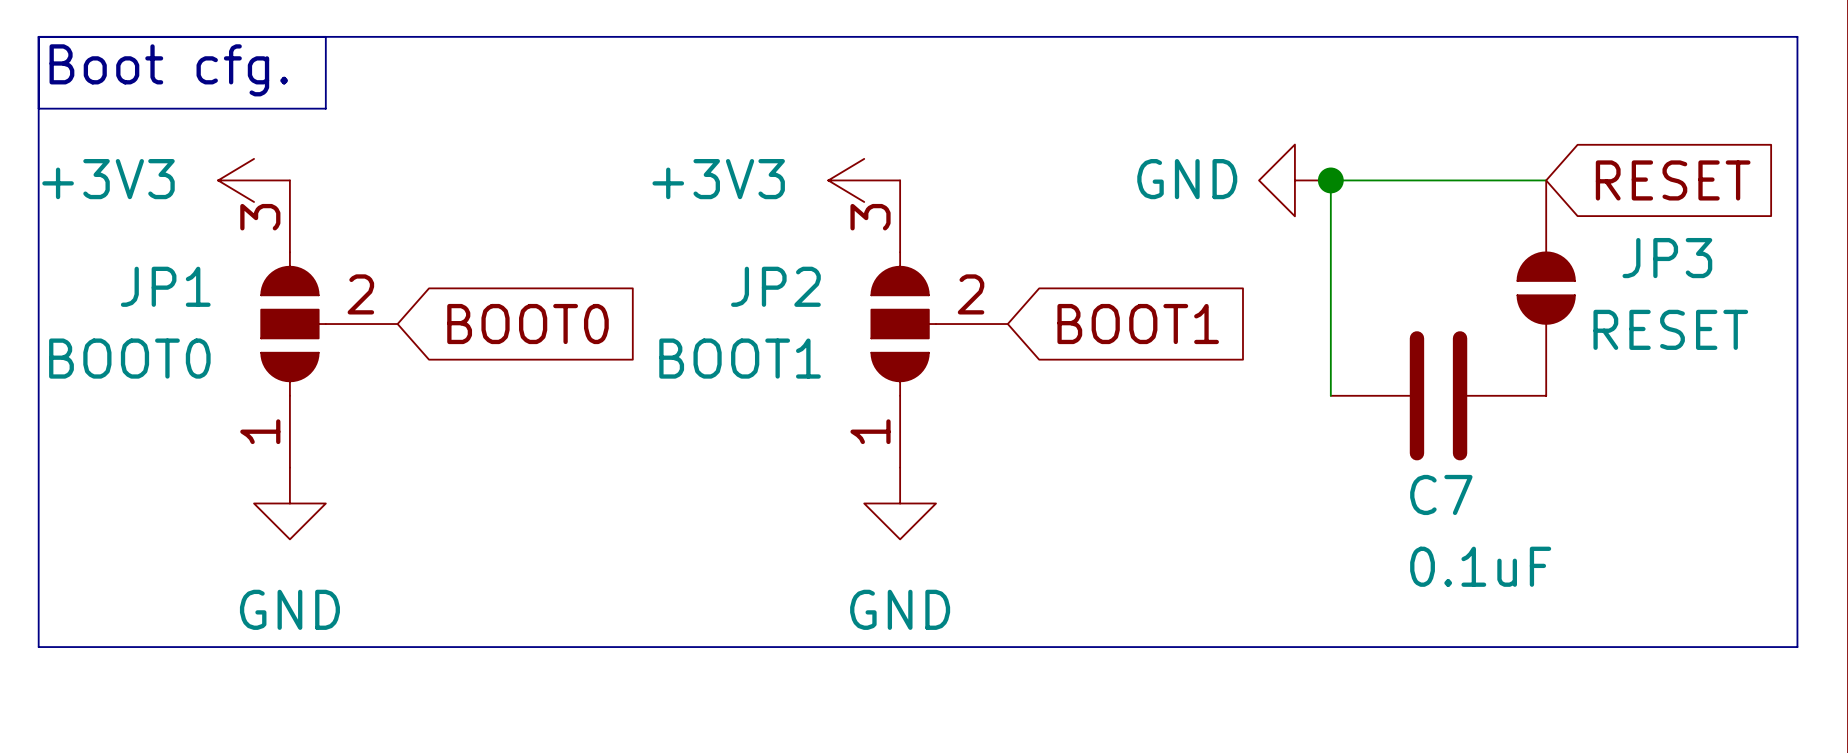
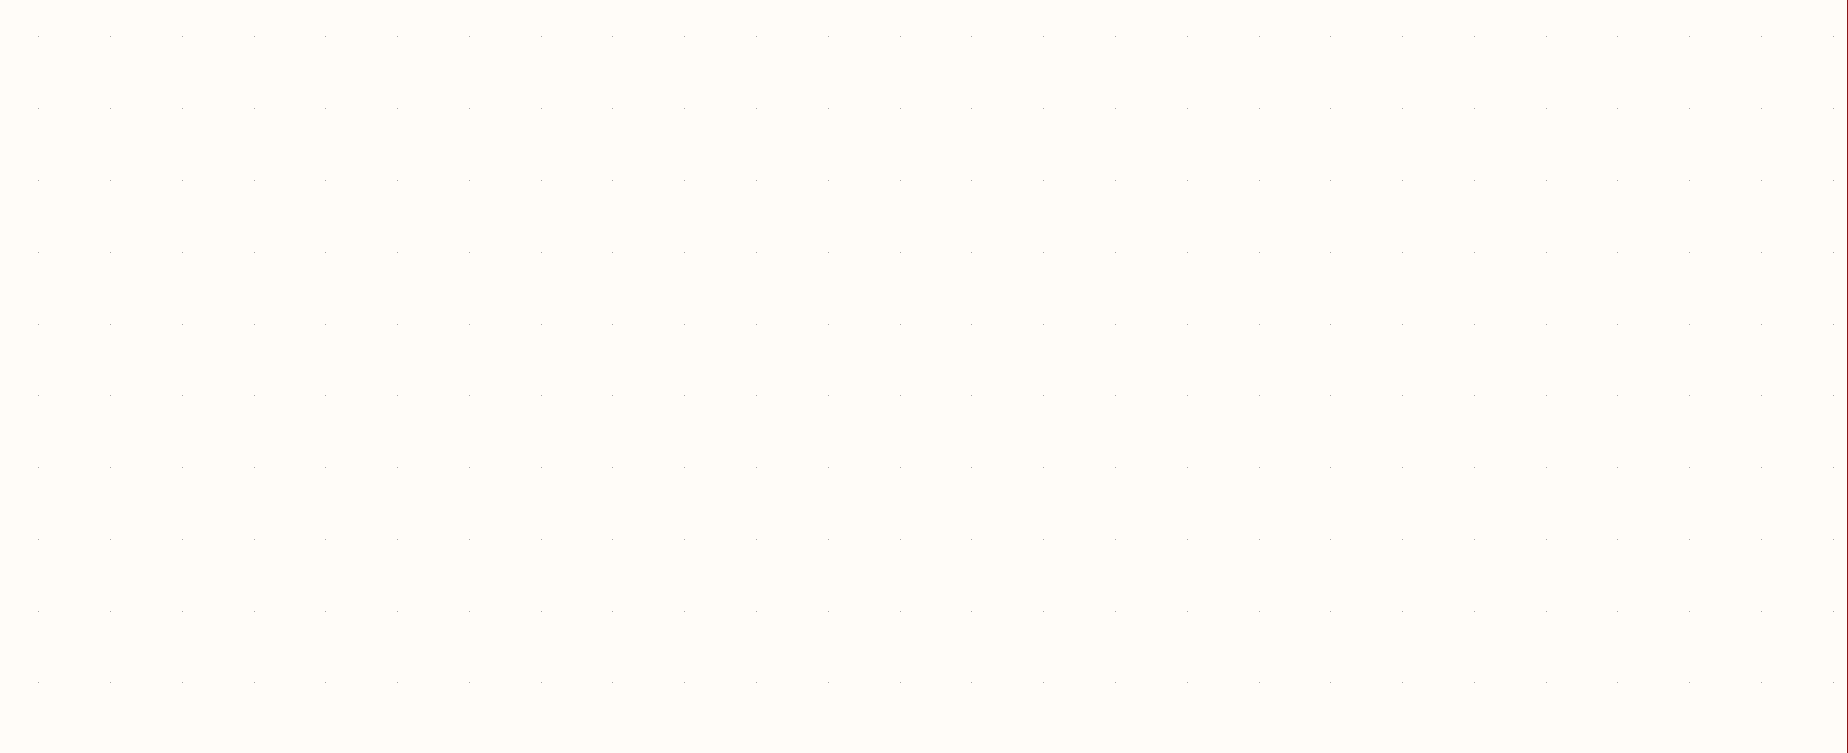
line: (38, 36) (1797, 36) (1797, 647) (38, 647) (38, 36) -> none
line: (325, 36) (325, 108) (38, 108) -> none
text: Boot cfg. (168, 70) -> none
power symbol: +3V3 (254, 180) -> none
power symbol: +3V3 (864, 180) -> none
power symbol: GND (1294, 180) -> none
junction: (1330, 180) -> none
wire: (1546, 180) (1330, 180) (1330, 395) -> none
global label: RESET (1673, 180) -> none
JP3: RESET (1546, 288) -> none
JP1: BOOT0 (329, 324) -> none
global label: BOOT0 (528, 324) -> none
JP2: BOOT1 (939, 324) -> none
global label: BOOT1 (1138, 324) -> none
C7: 0.1uF (1438, 395) -> none
power symbol: GND (289, 503) -> none
power symbol: GND (900, 503) -> none

